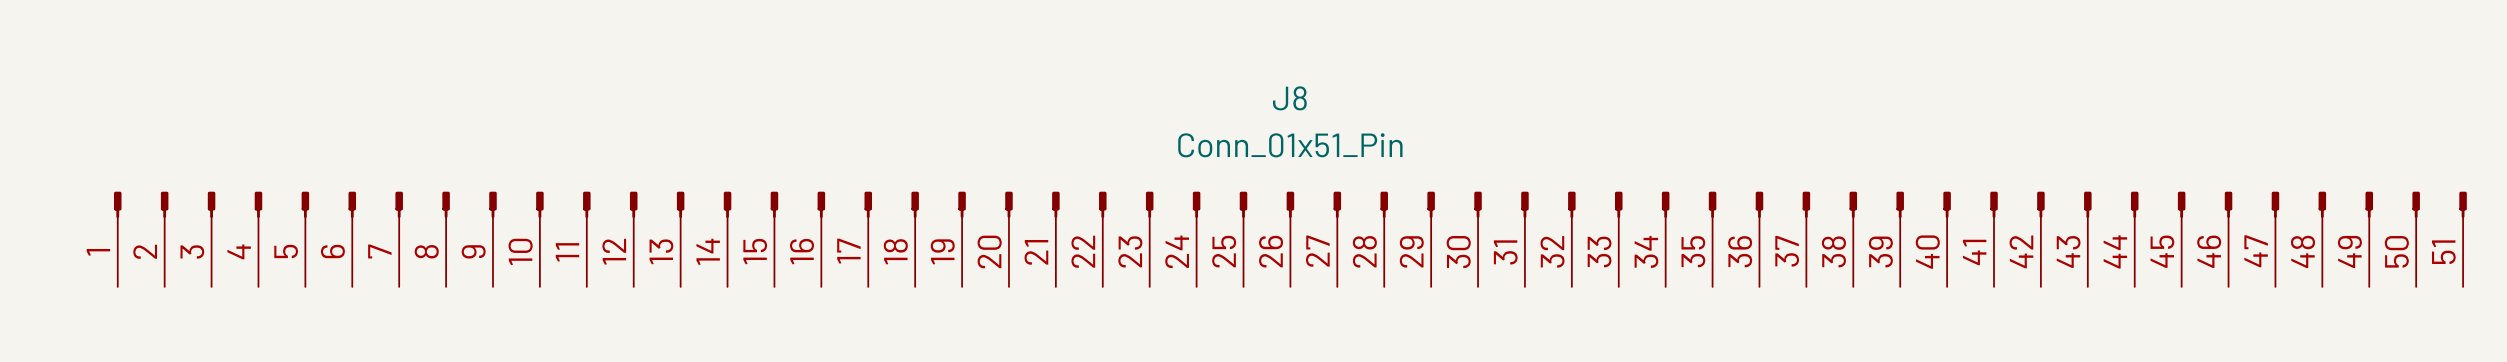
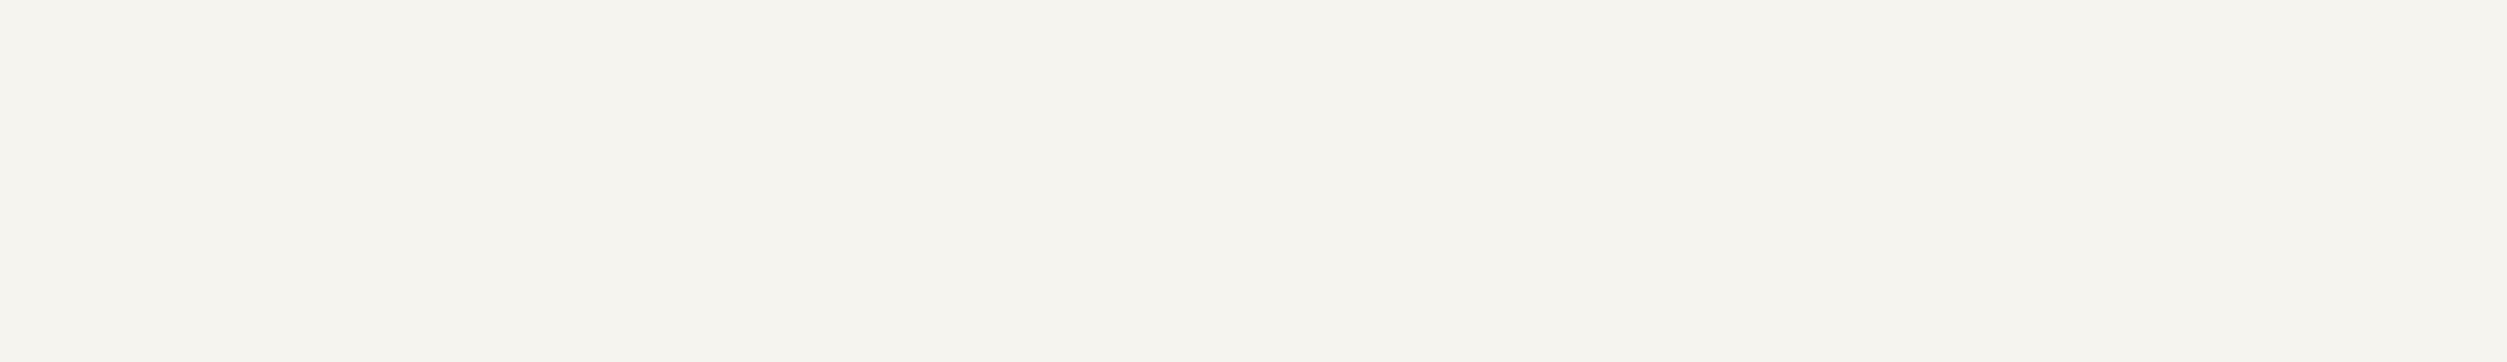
J8: Conn_01x51_Pin (1290, 239) -> none

